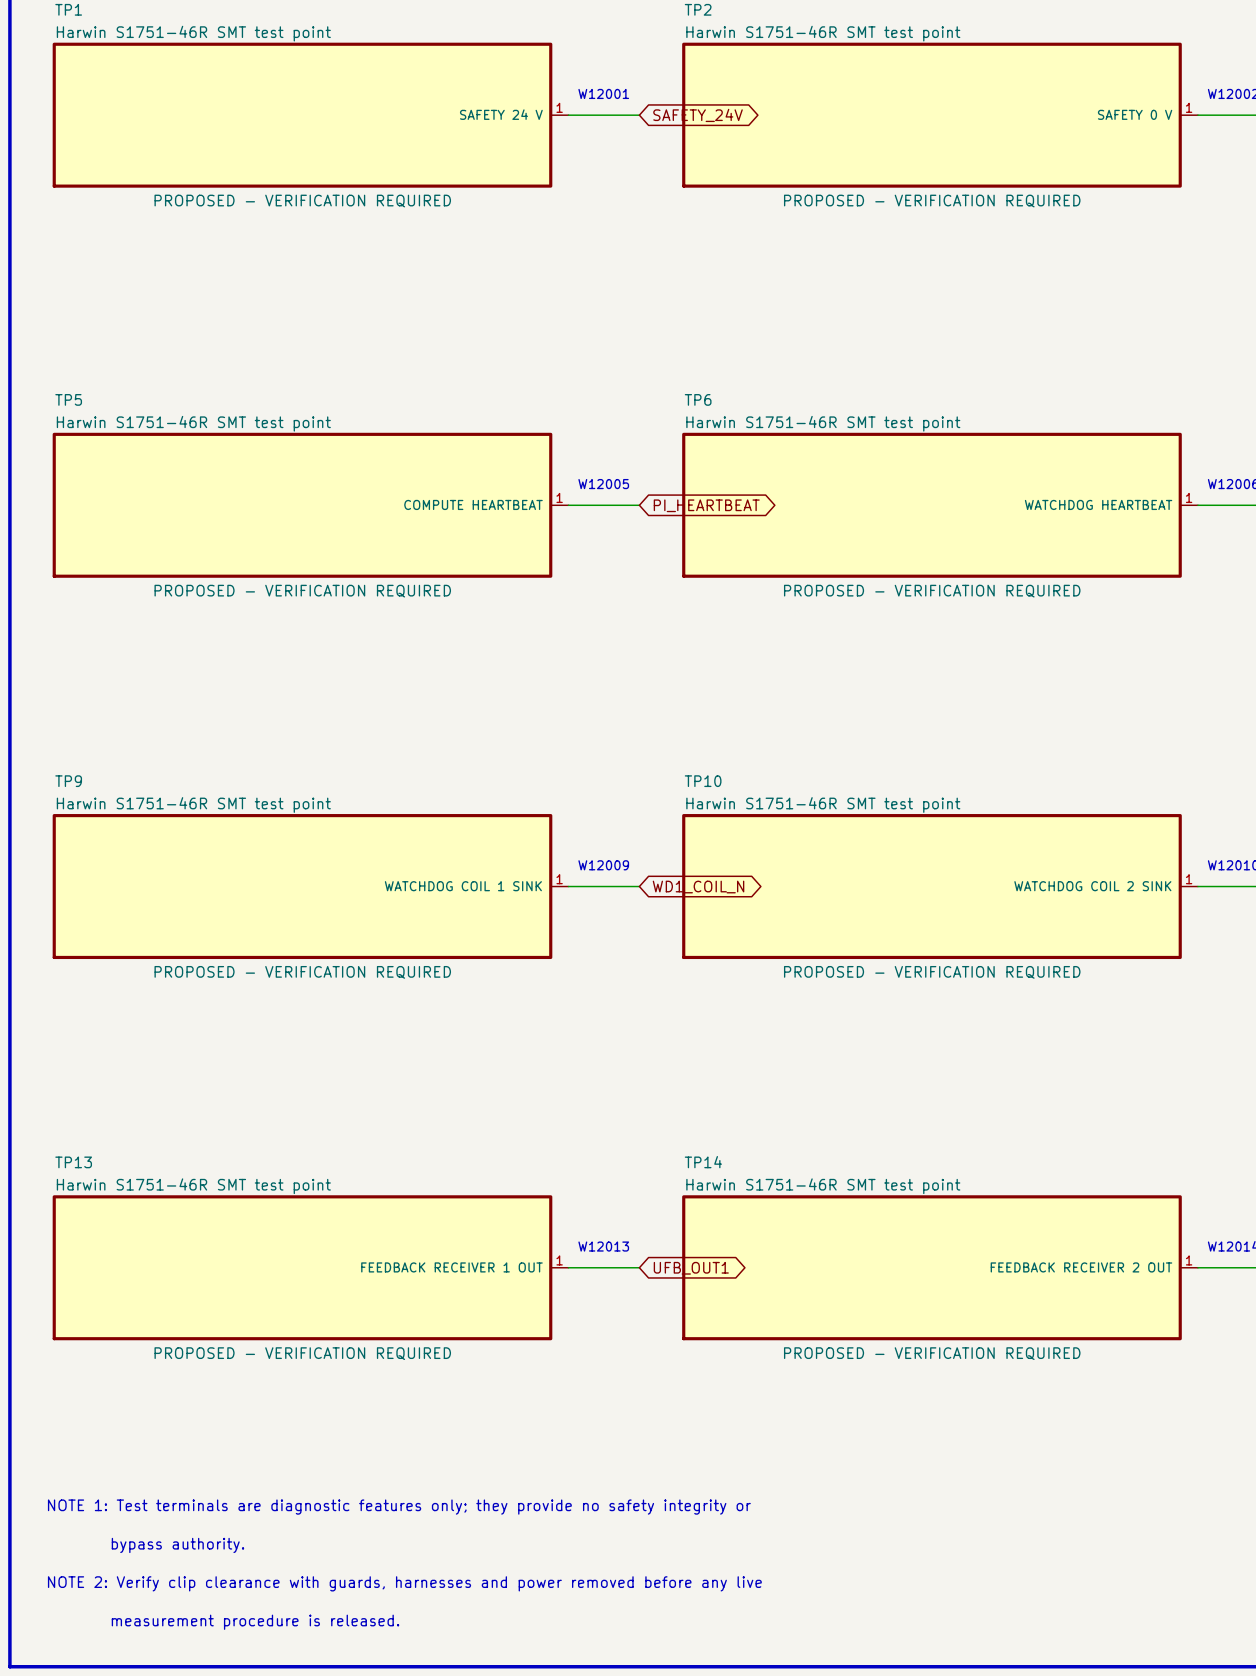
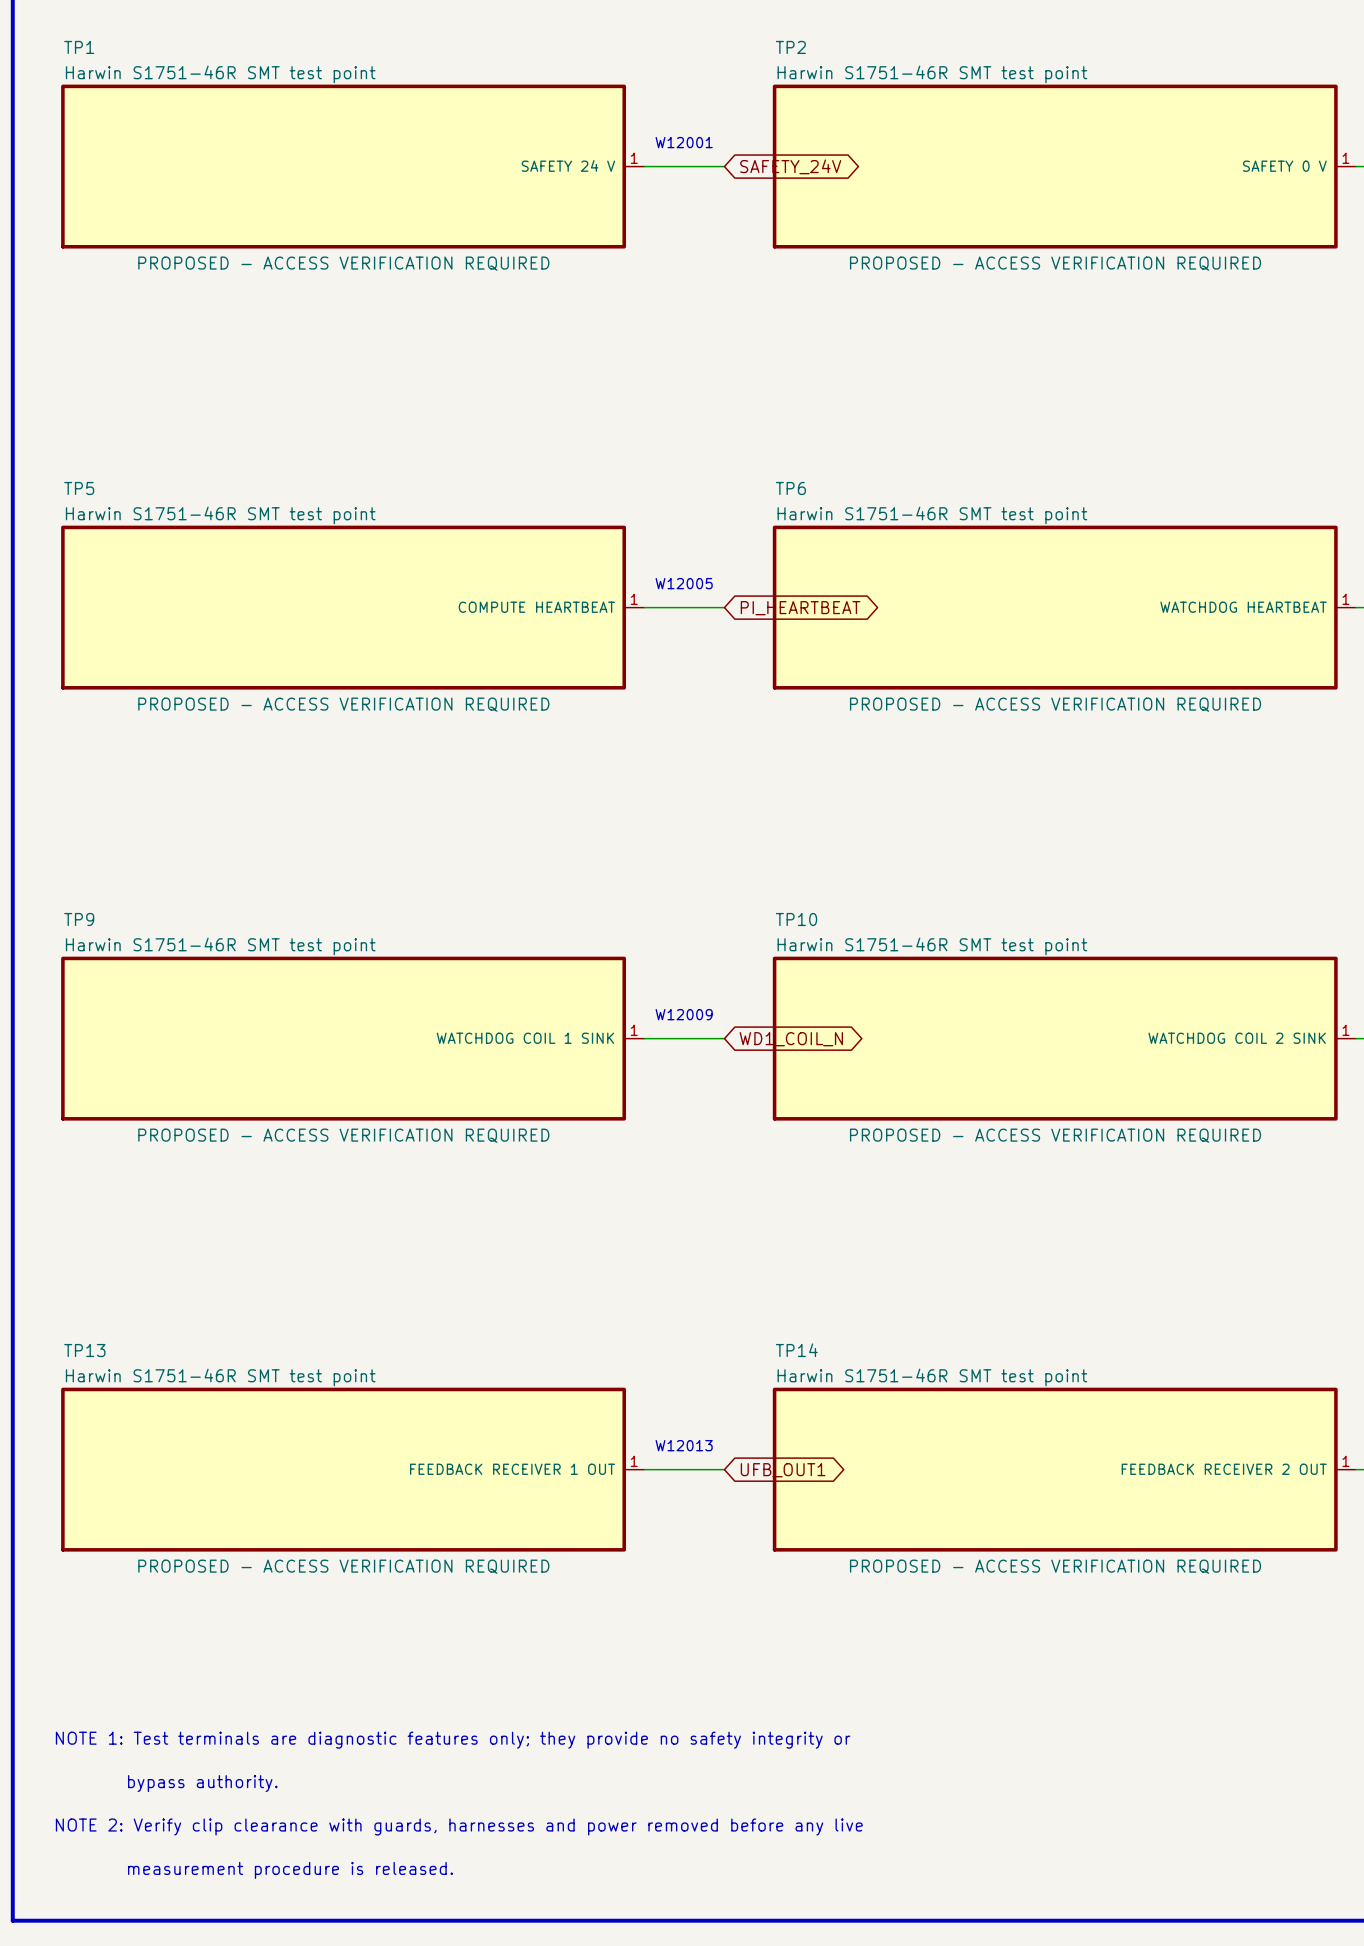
TP1 text: PROPOSED - VERIFICATION REQUIRED (302, 201) -> PROPOSED - ACCESS VERIFICATION REQUIRED (343, 263)
TP2 text: PROPOSED - VERIFICATION REQUIRED (932, 201) -> PROPOSED - ACCESS VERIFICATION REQUIRED (1055, 263)
TP5 text: PROPOSED - VERIFICATION REQUIRED (302, 591) -> PROPOSED - ACCESS VERIFICATION REQUIRED (343, 704)
TP6 text: PROPOSED - VERIFICATION REQUIRED (932, 591) -> PROPOSED - ACCESS VERIFICATION REQUIRED (1055, 704)
TP9 text: PROPOSED - VERIFICATION REQUIRED (302, 972) -> PROPOSED - ACCESS VERIFICATION REQUIRED (343, 1135)
TP10 text: PROPOSED - VERIFICATION REQUIRED (932, 972) -> PROPOSED - ACCESS VERIFICATION REQUIRED (1055, 1135)
TP13 text: PROPOSED - VERIFICATION REQUIRED (302, 1353) -> PROPOSED - ACCESS VERIFICATION REQUIRED (343, 1566)
TP14 text: PROPOSED - VERIFICATION REQUIRED (932, 1353) -> PROPOSED - ACCESS VERIFICATION REQUIRED (1055, 1566)

